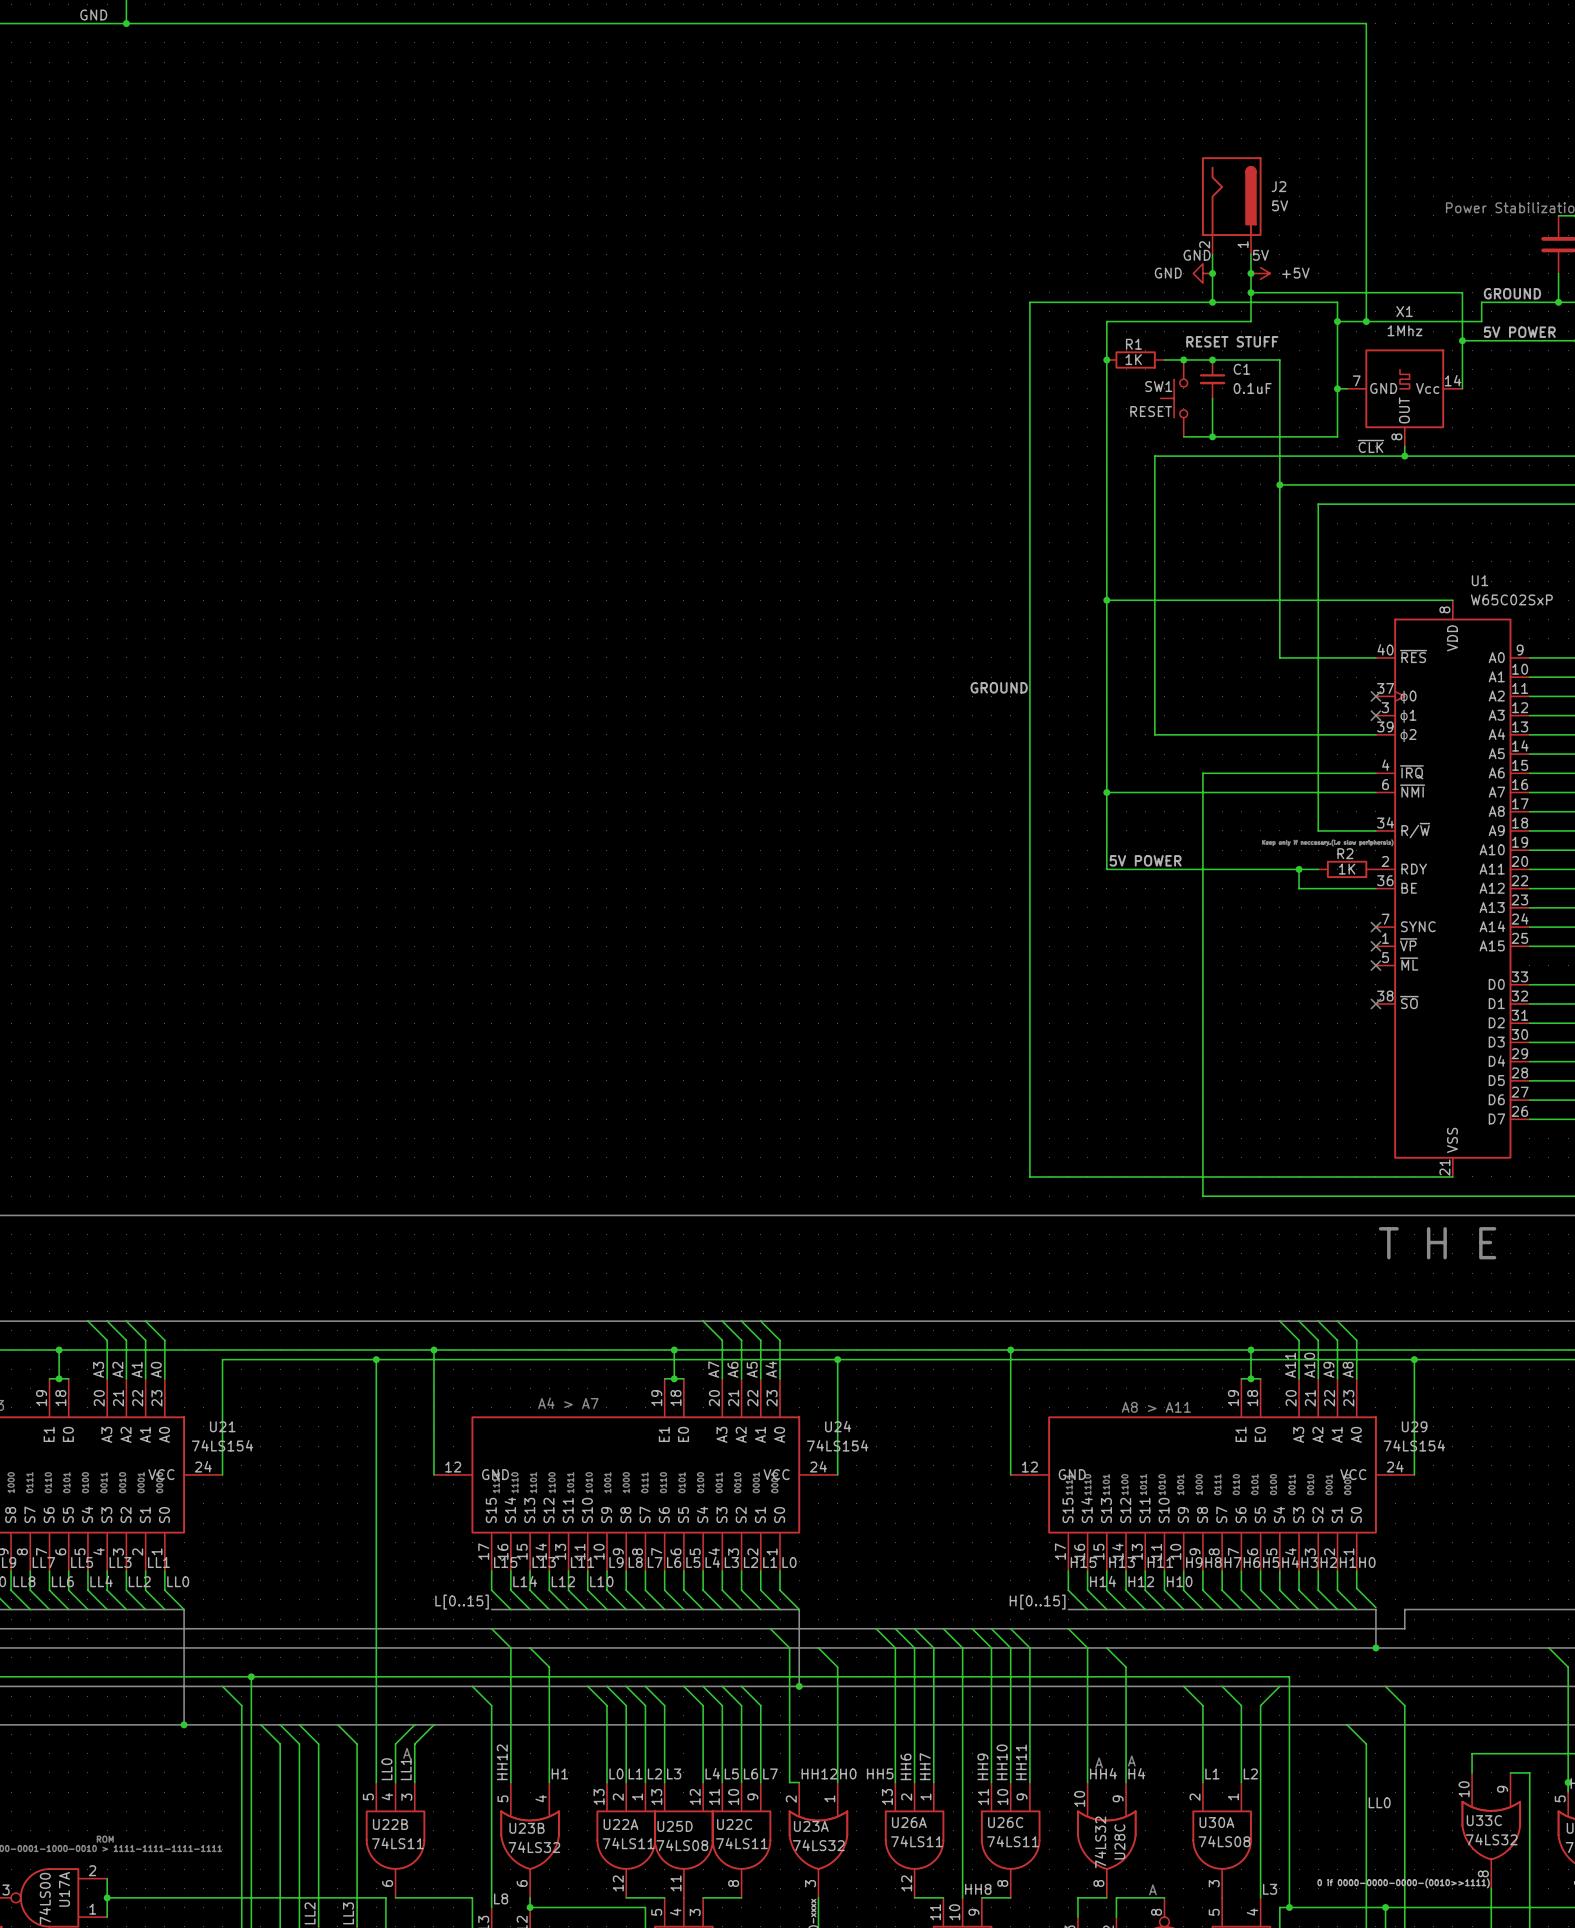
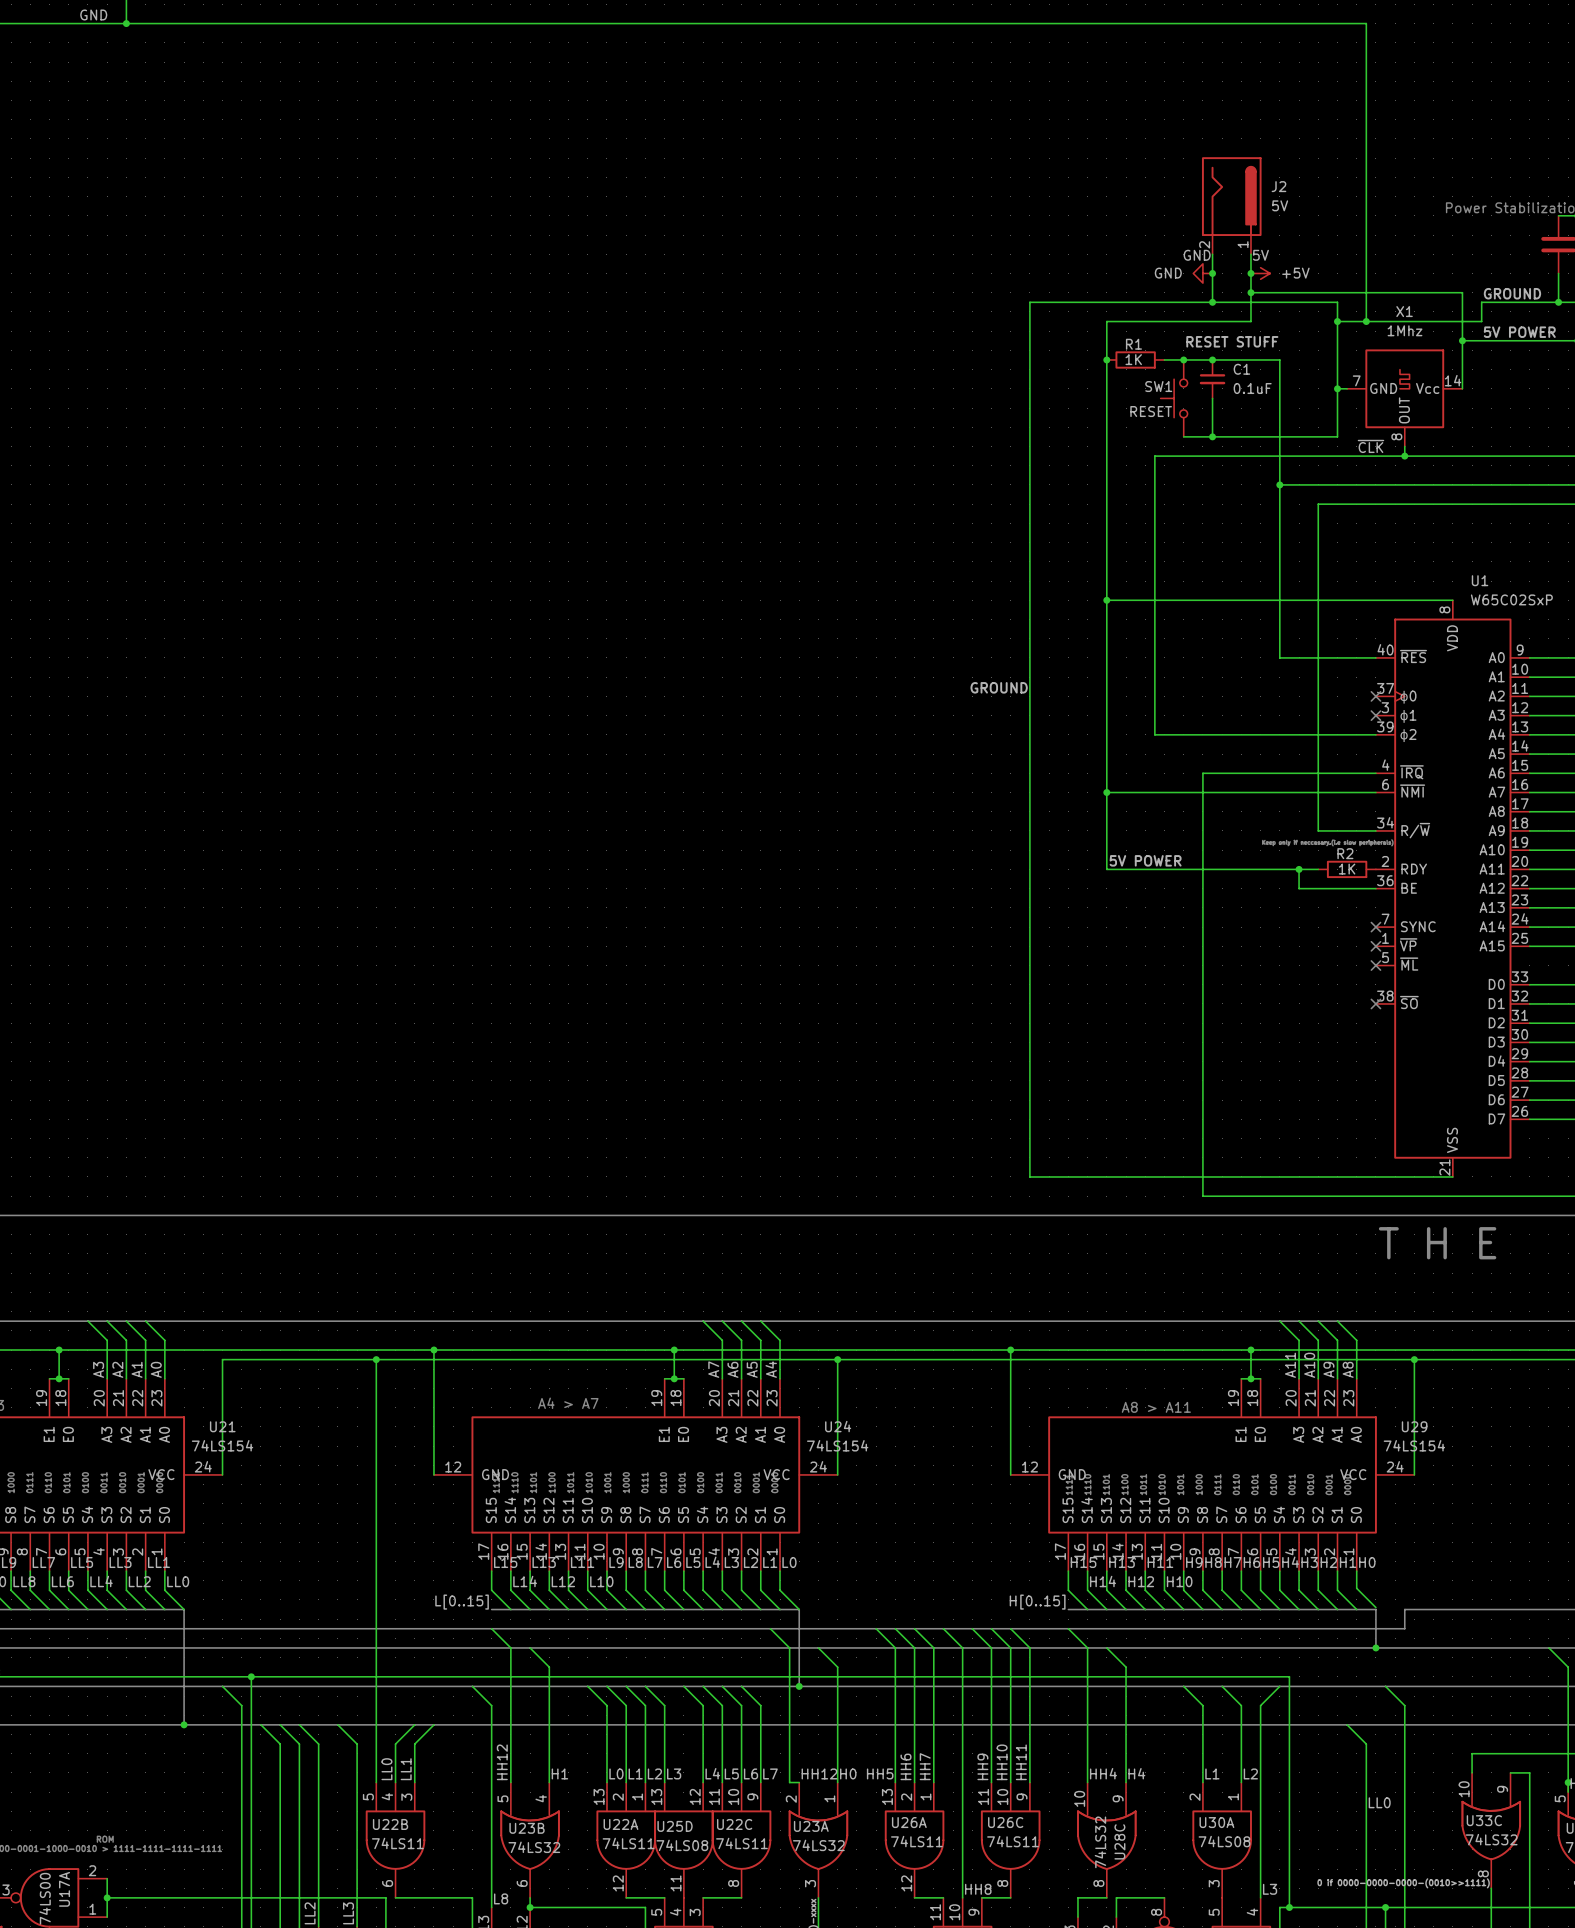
text: A (407, 1753) -> none
text: A (1131, 1761) -> none
text: A (1099, 1762) -> none
text: A (1152, 1889) -> none

